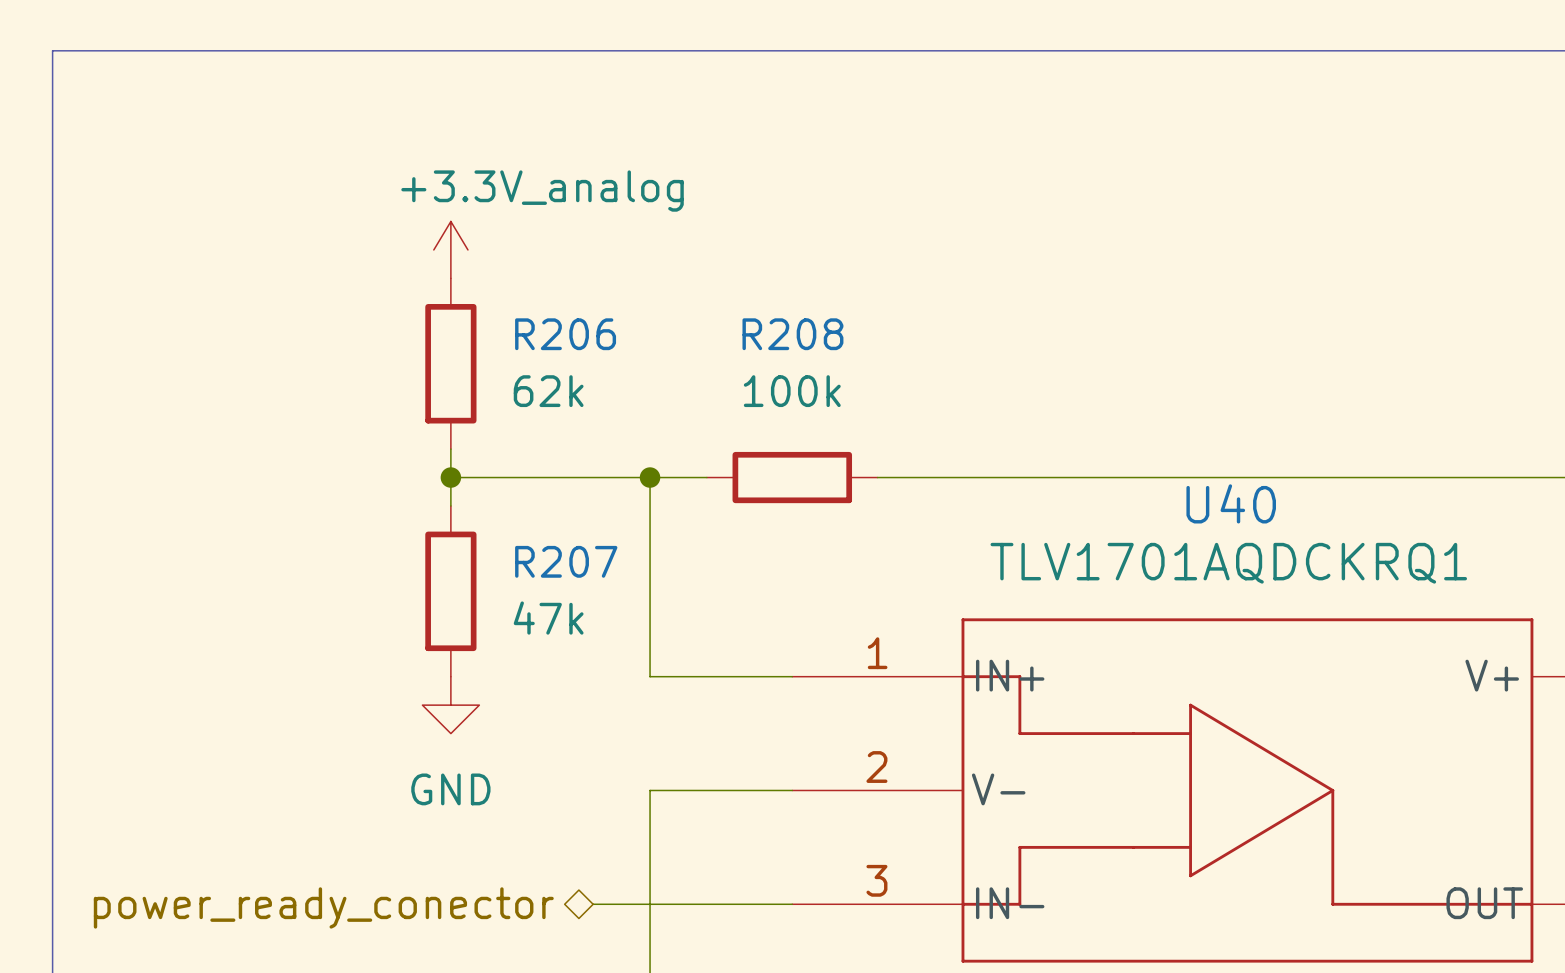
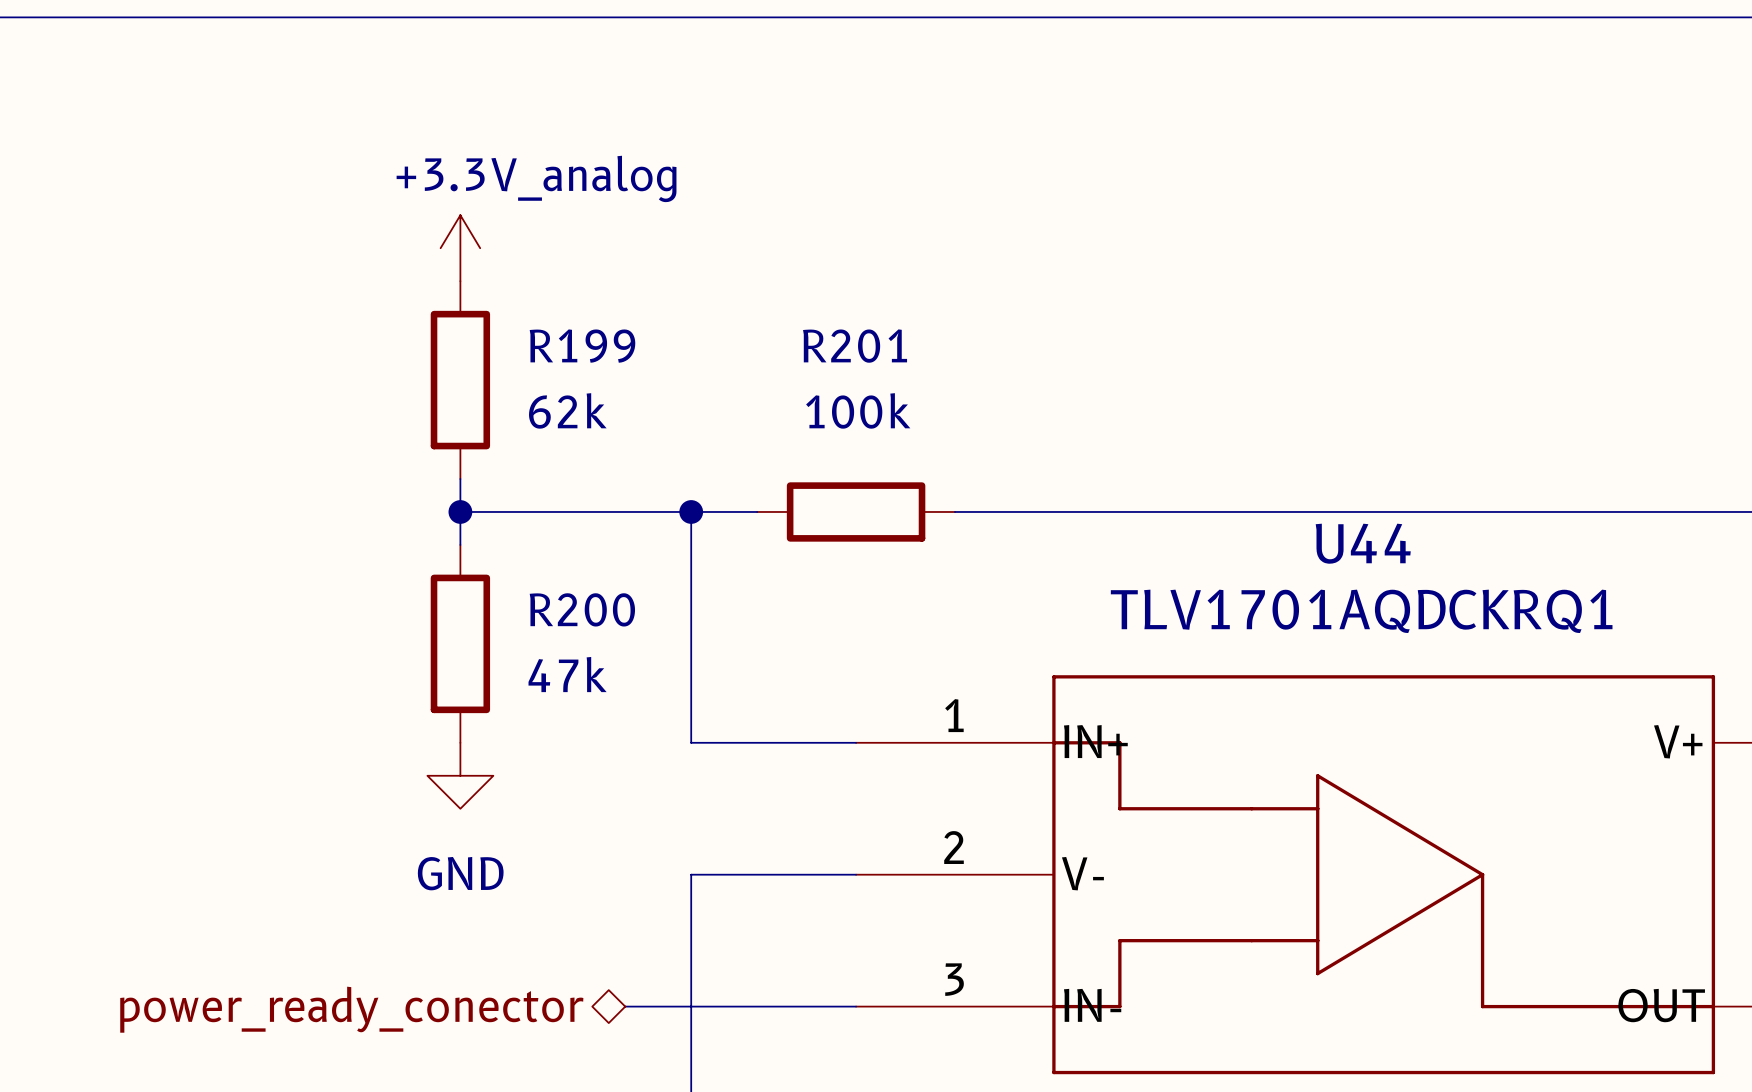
R206 name: R206 (565, 334) -> R199 (582, 346)
R208 name: R208 (792, 334) -> R201 (855, 346)
U40 name: U40 (1231, 503) -> U44 (1363, 543)
R207 name: R207 (566, 561) -> R200 (582, 609)

